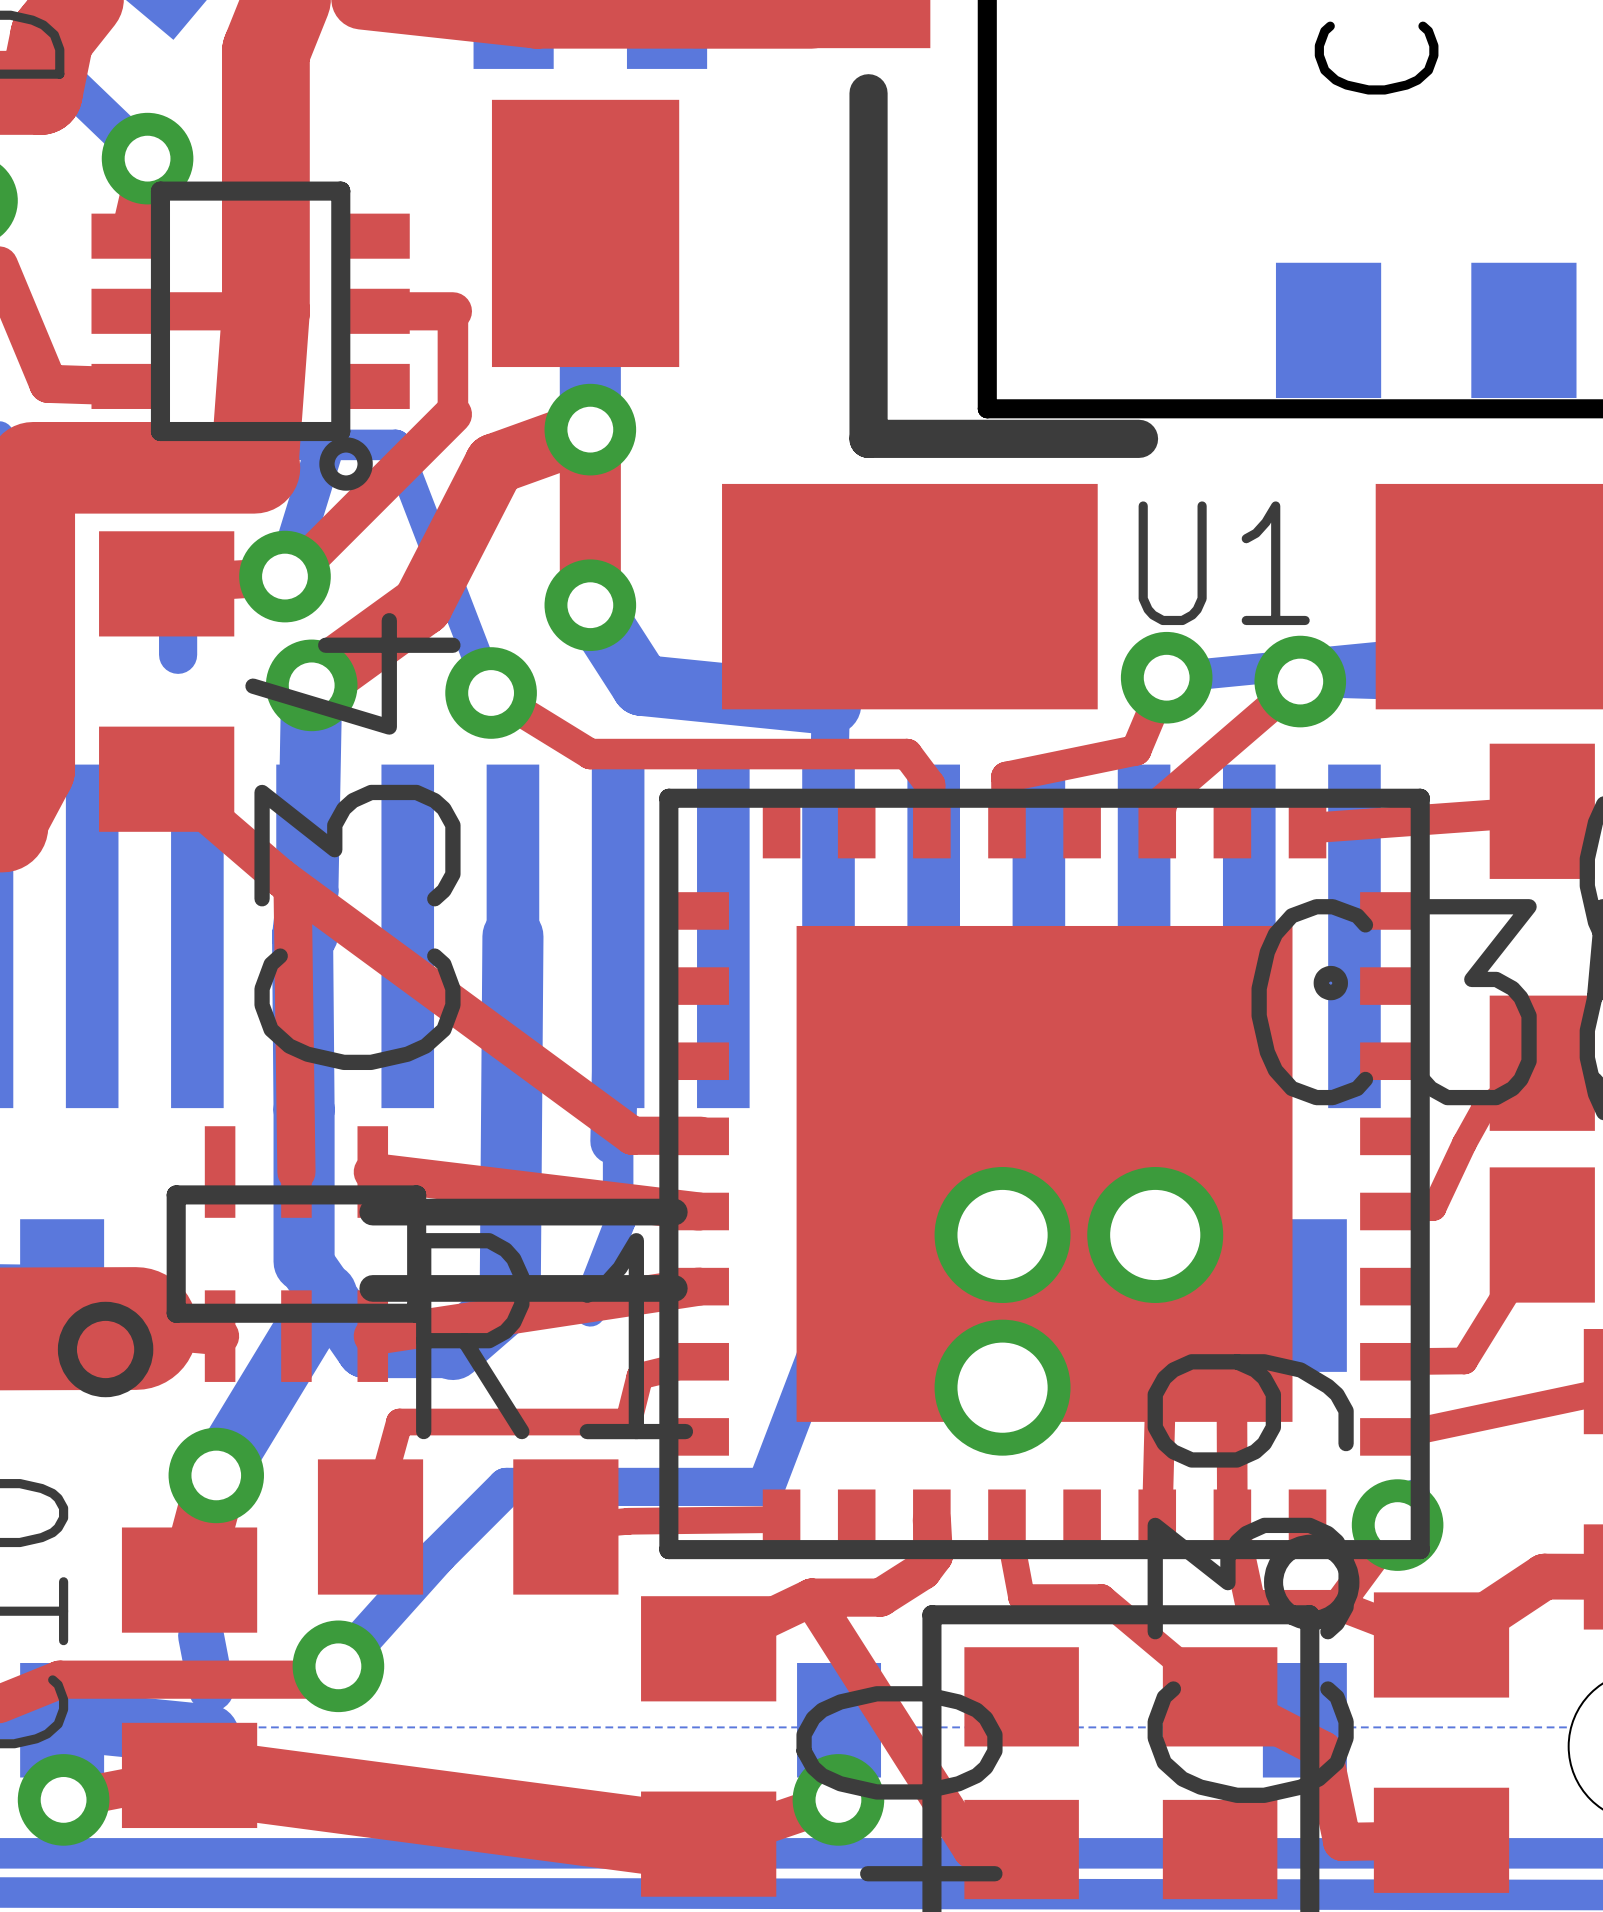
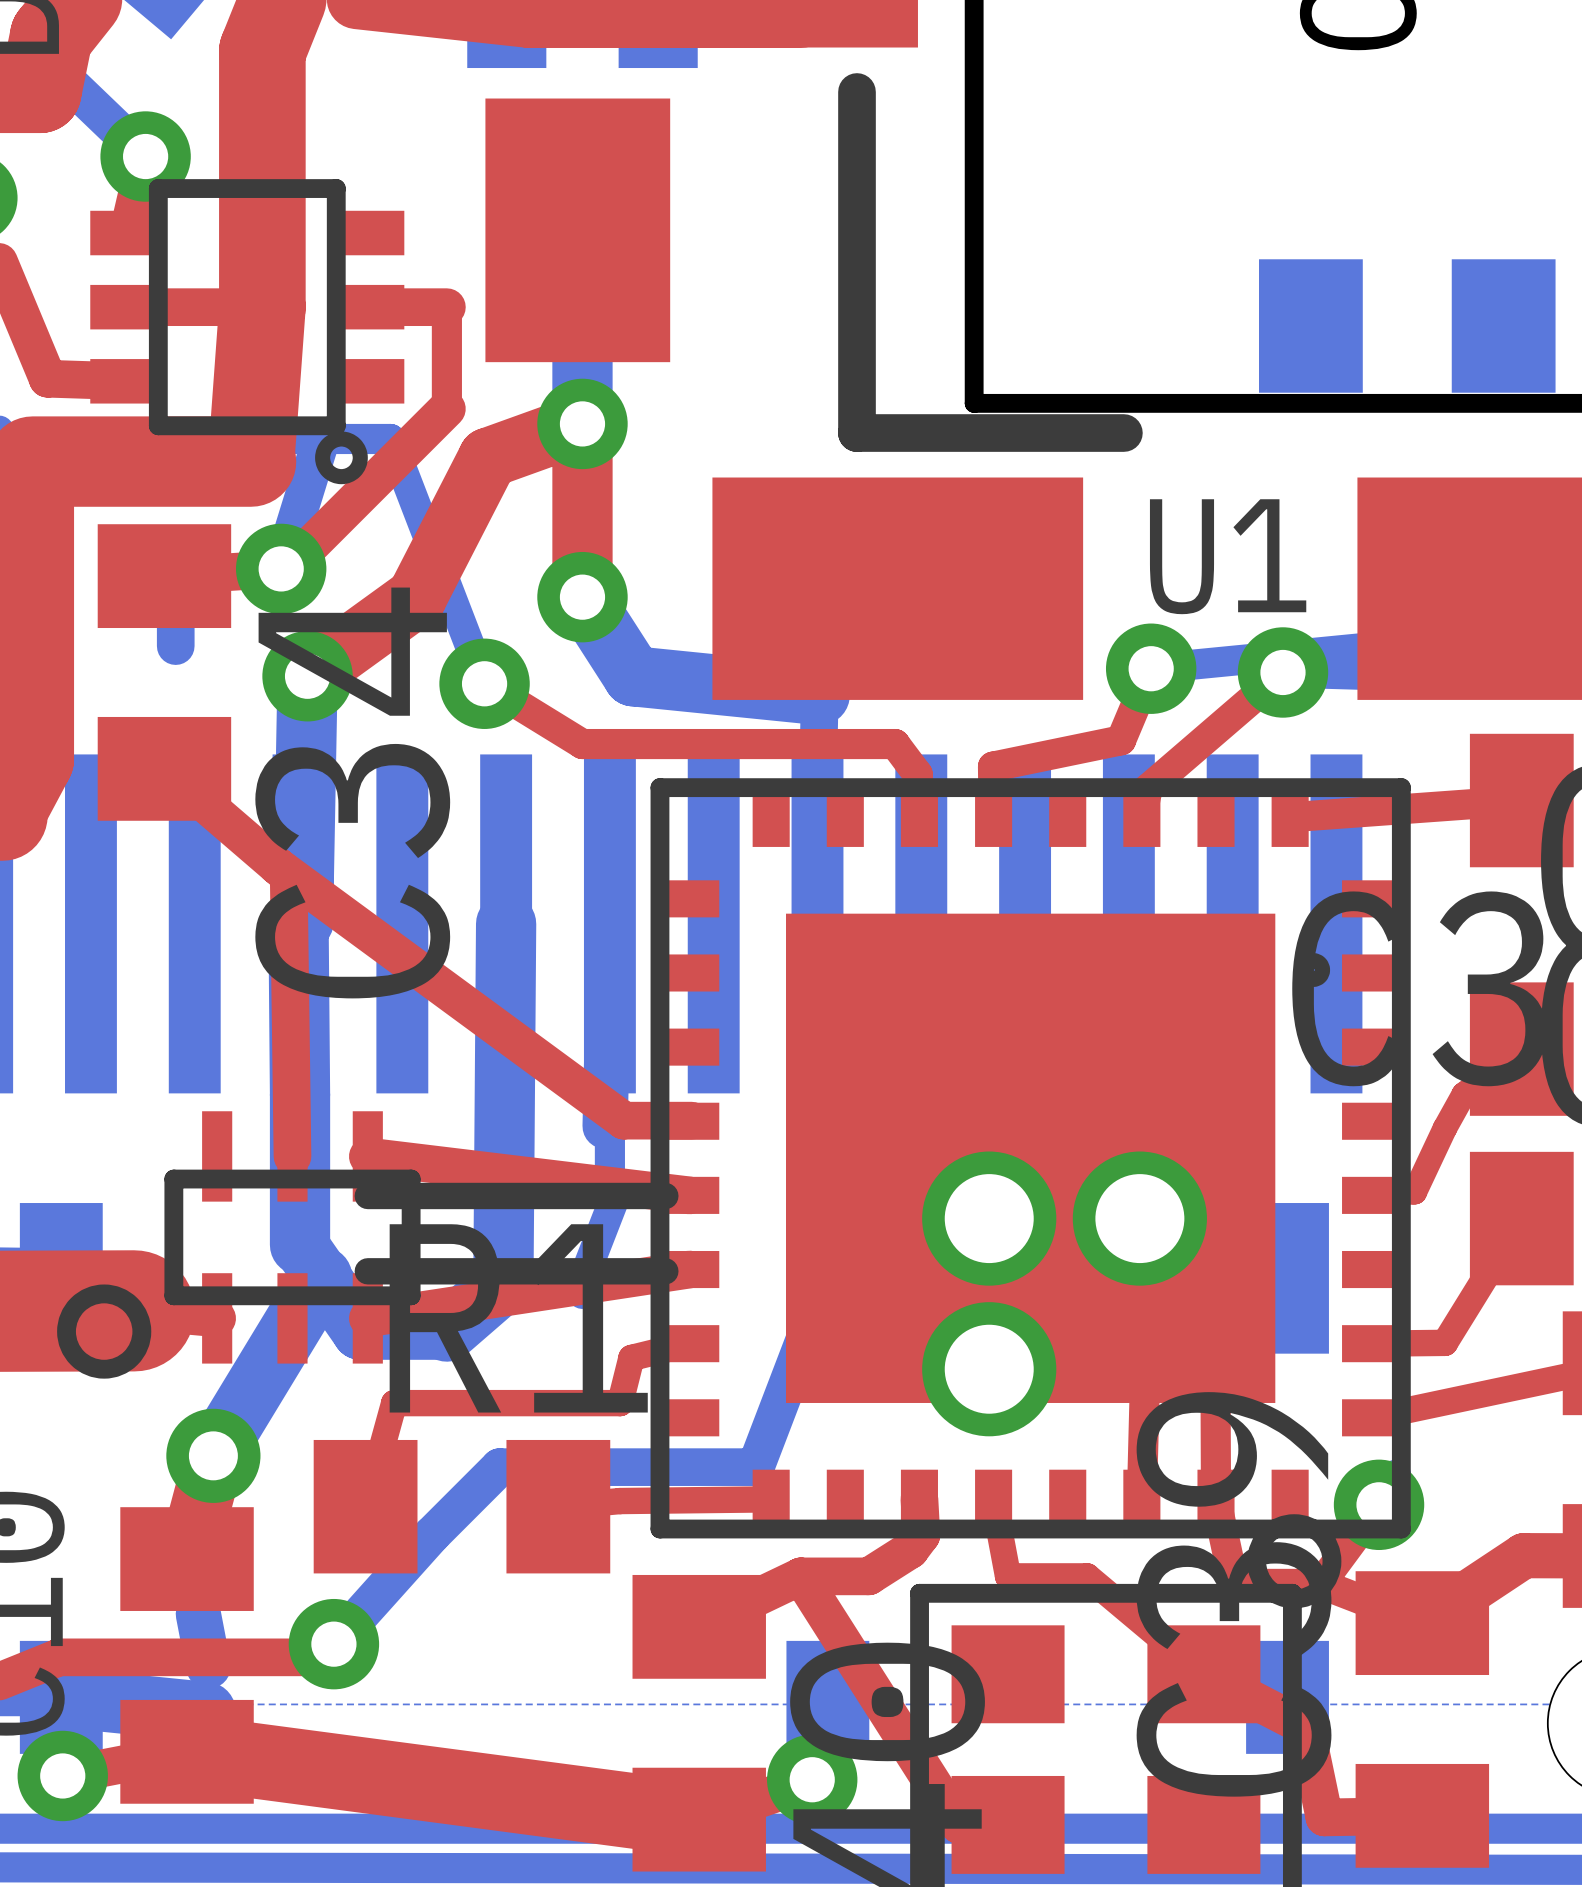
via position: (838, 1799) -> (812, 1779)

